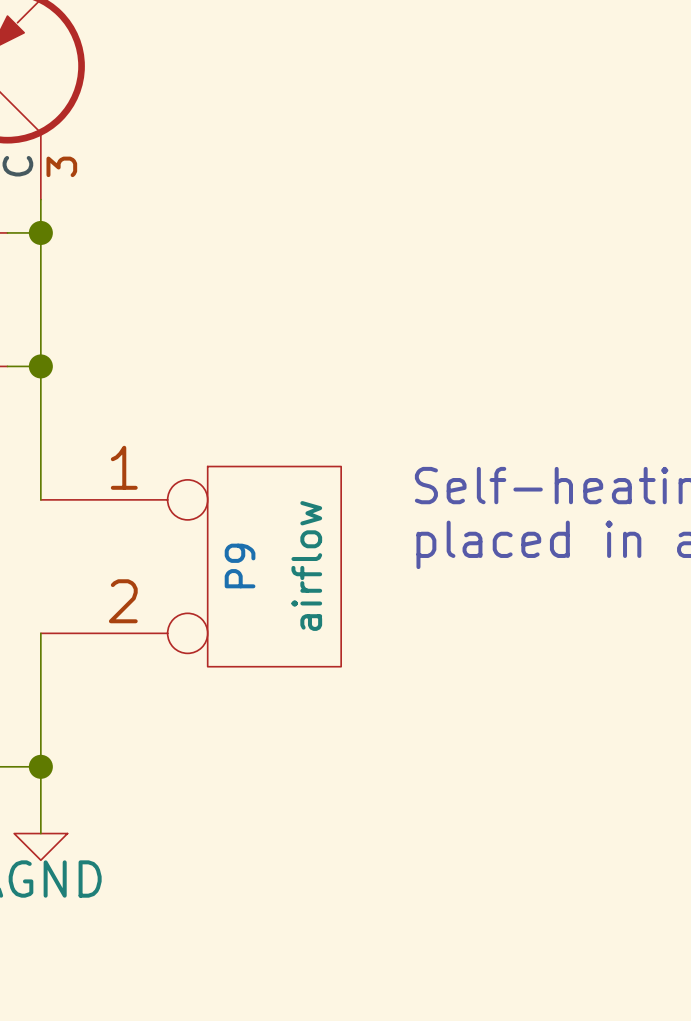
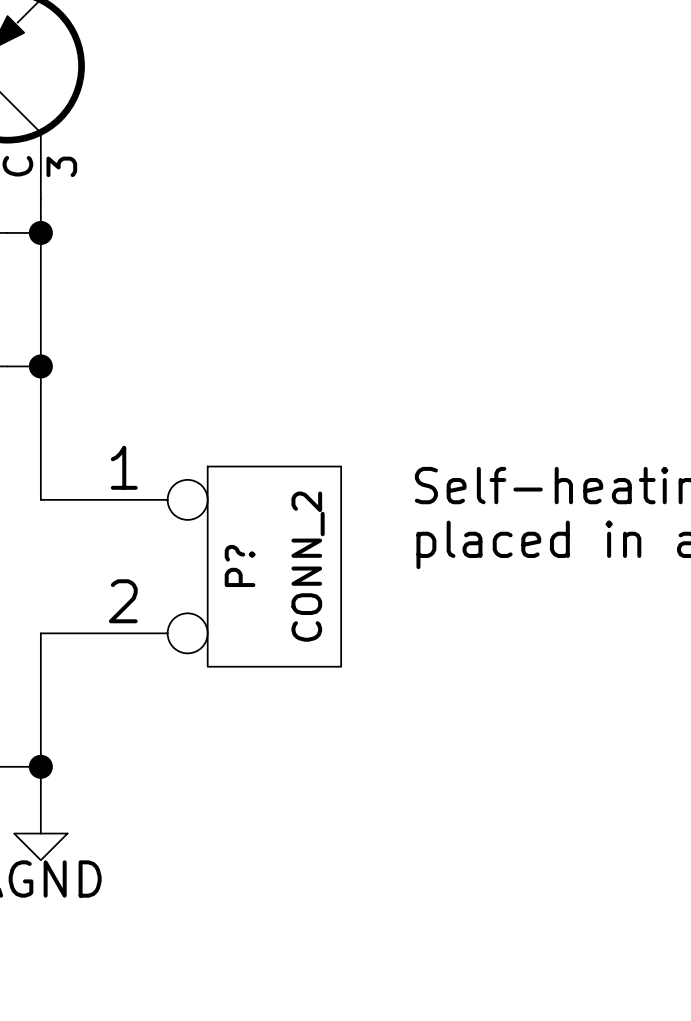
P9 name: P9 (240, 565) -> P? (240, 565)
P9 value: airflow (306, 565) -> CONN_2 (308, 566)

